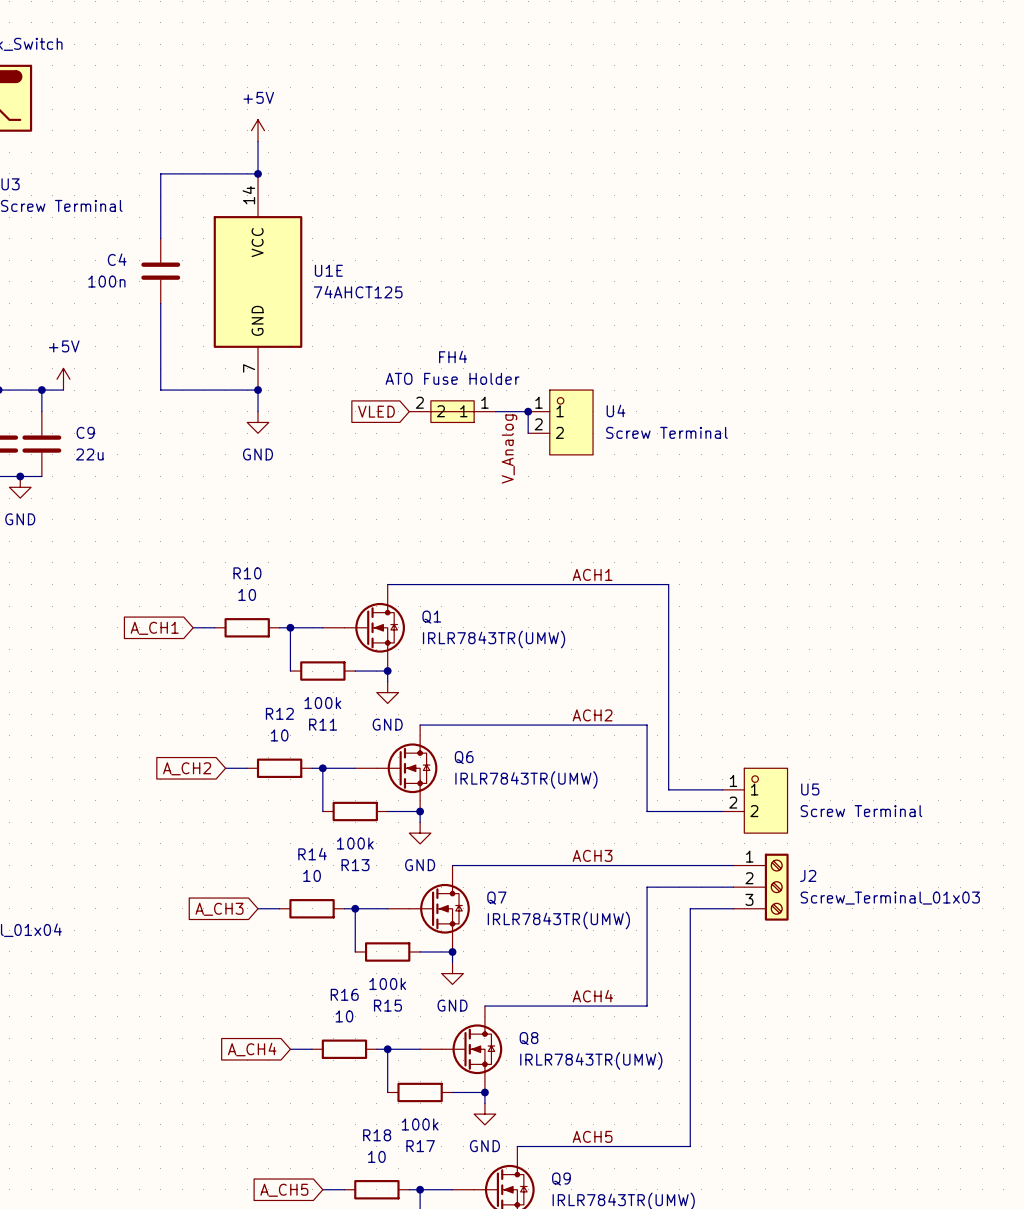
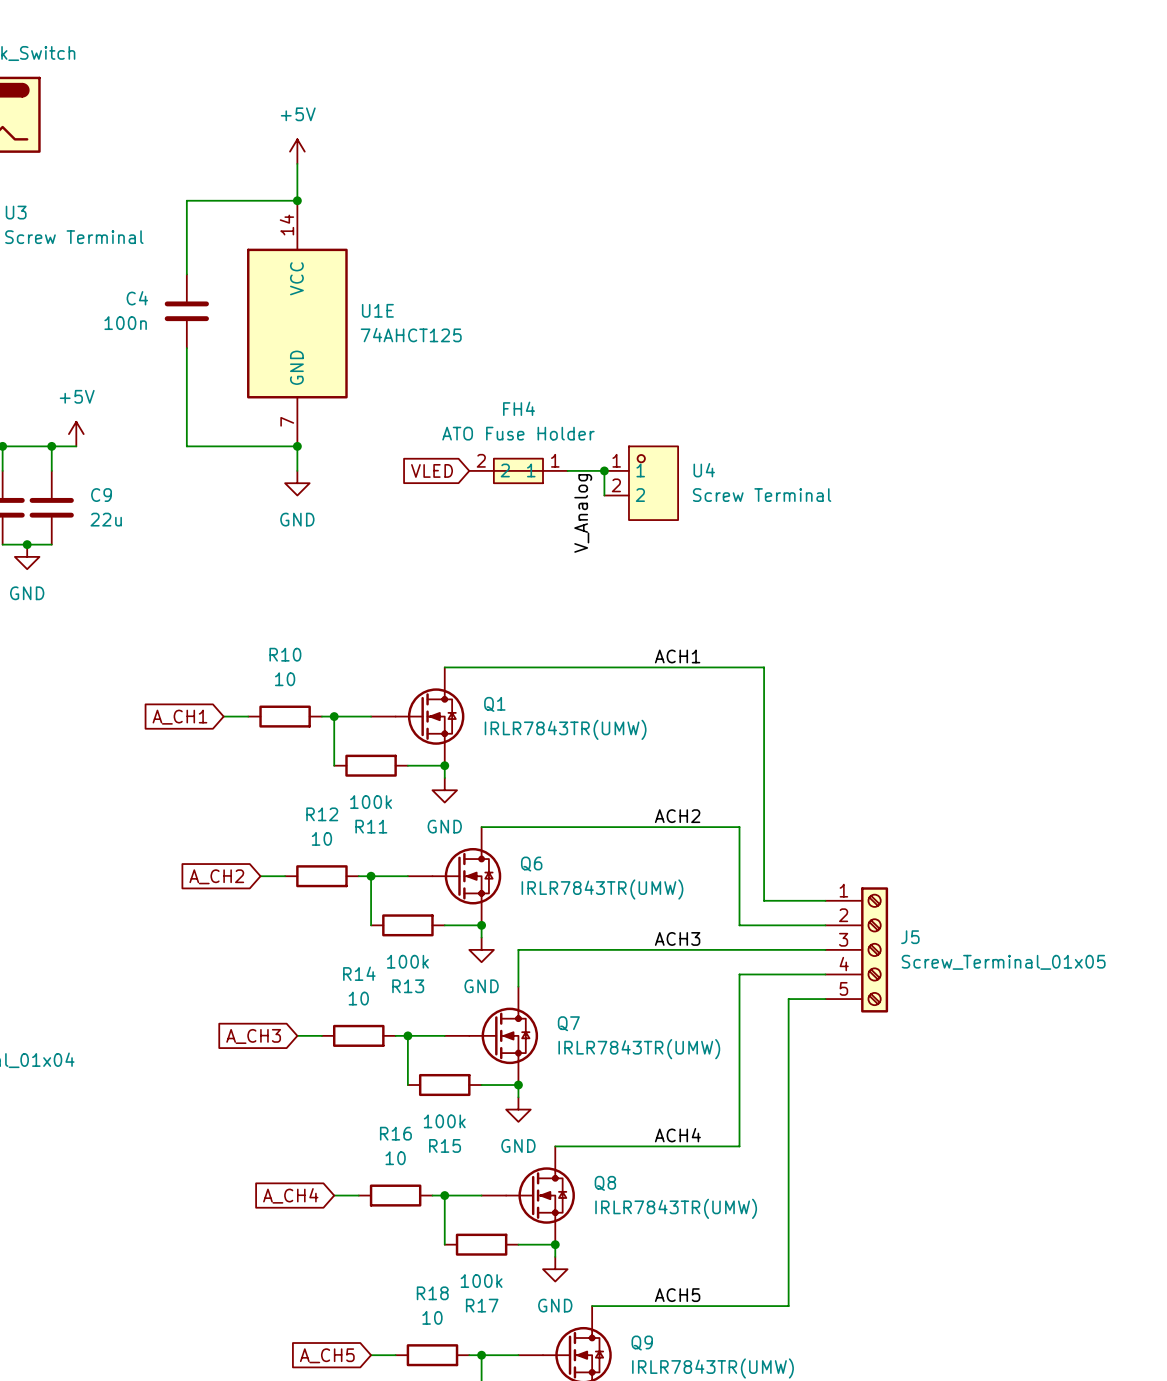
U5: Screw Terminal (755, 800) -> none
J5: none -> Screw_Terminal_01x05 (856, 949)
label position: ACH3 (592, 855) -> ACH3 (677, 938)
wire: (452, 865) (733, 865) -> (518, 986) (518, 949) (825, 949)
wire: (647, 887) (733, 887) -> (739, 1011) (739, 974) (825, 974)
J2: Screw_Terminal_01x03 (761, 887) -> none
wire: (690, 908) (733, 908) -> (788, 1035) (788, 999) (825, 999)

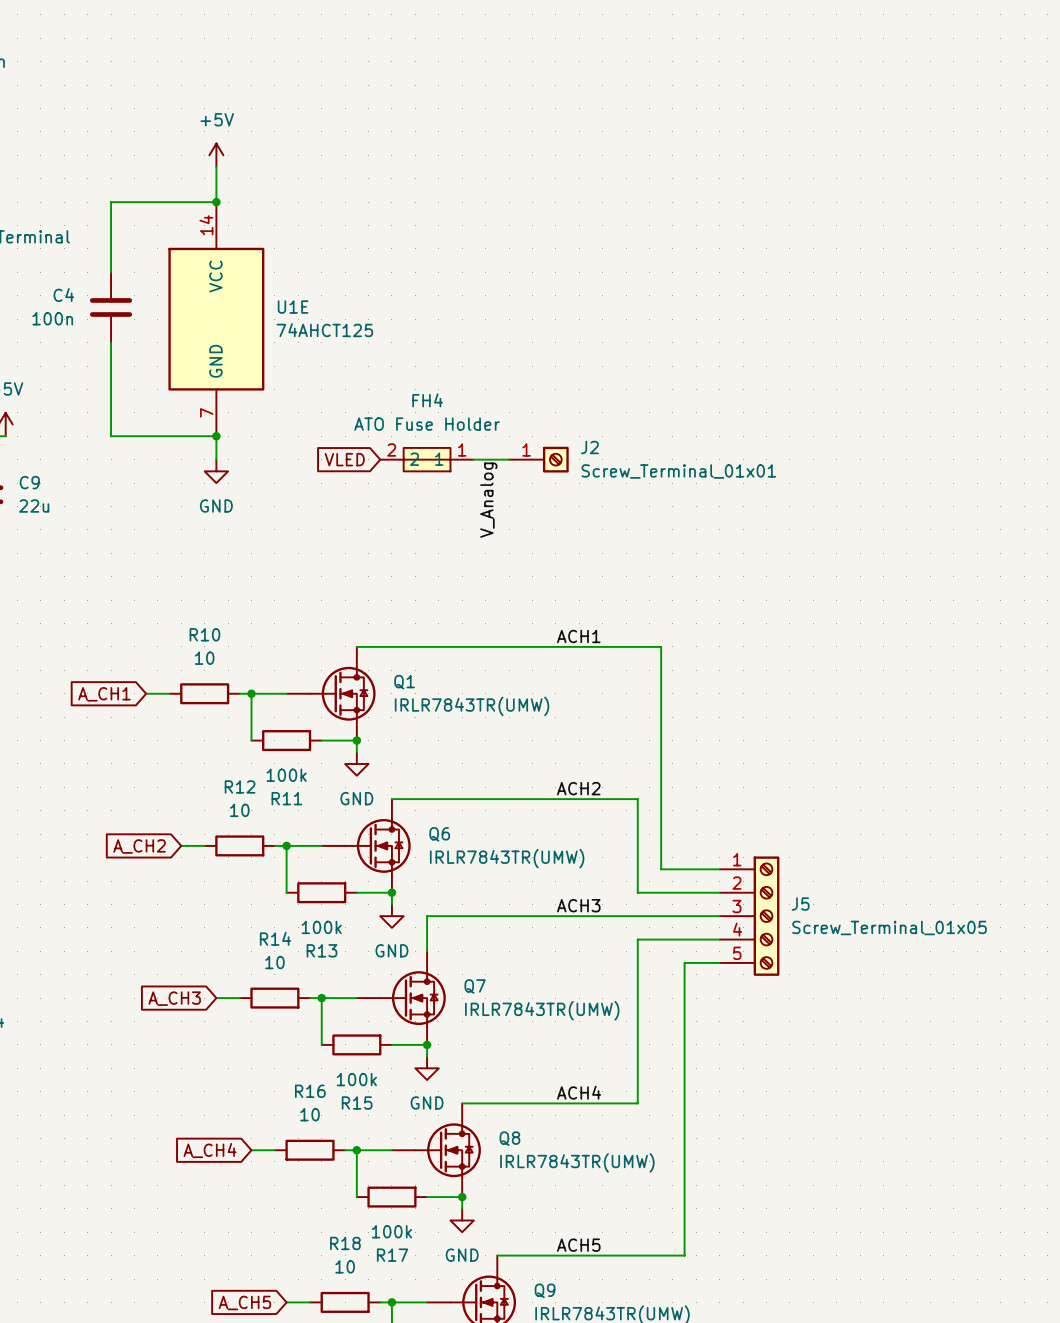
wire: (604, 470) (604, 495) -> none
junction: (604, 470) -> none
J2: none -> Screw_Terminal_01x01 (538, 459)
U4: Screw Terminal (641, 483) -> none

